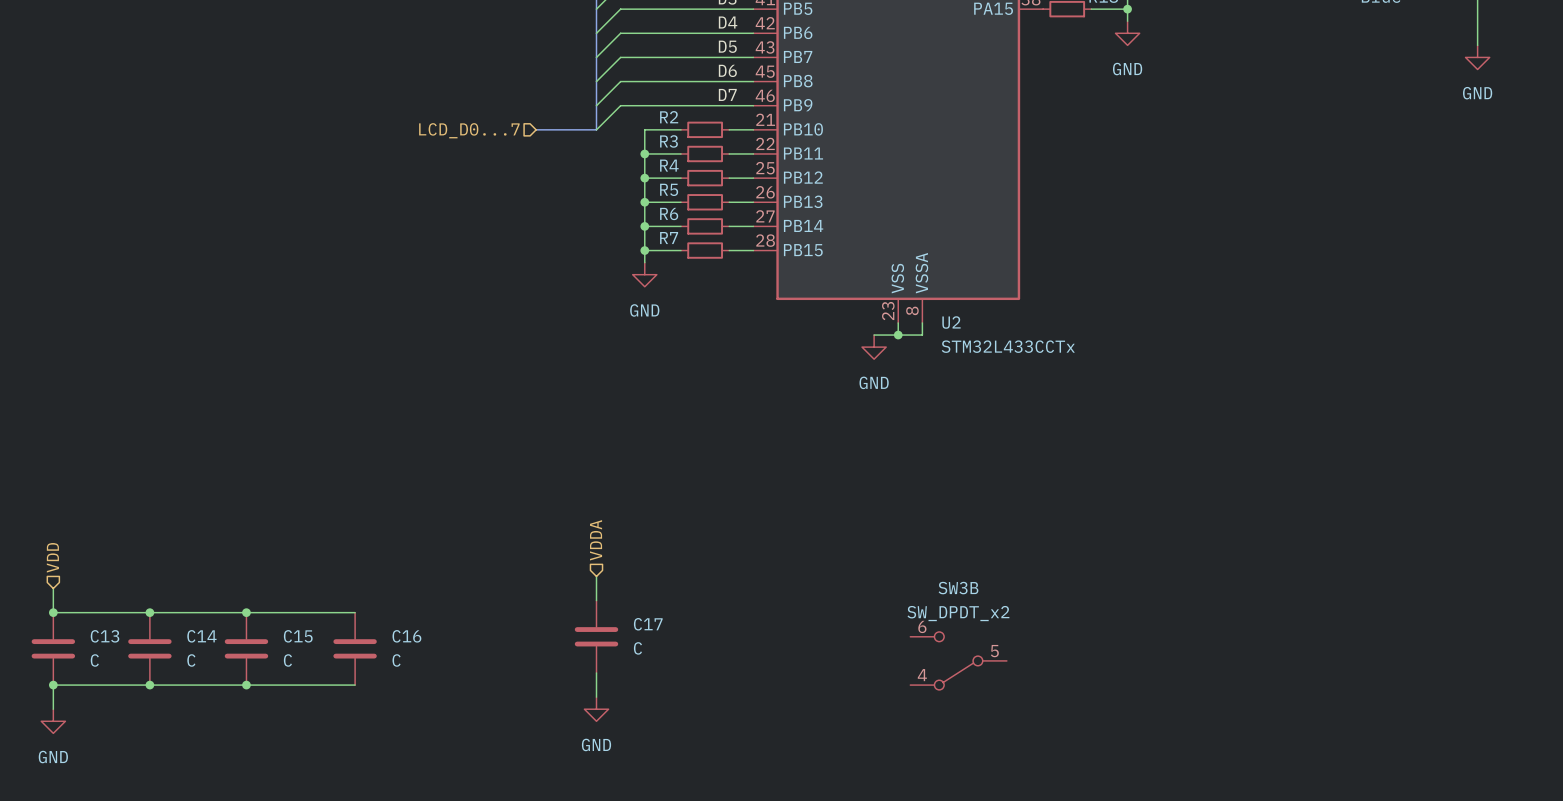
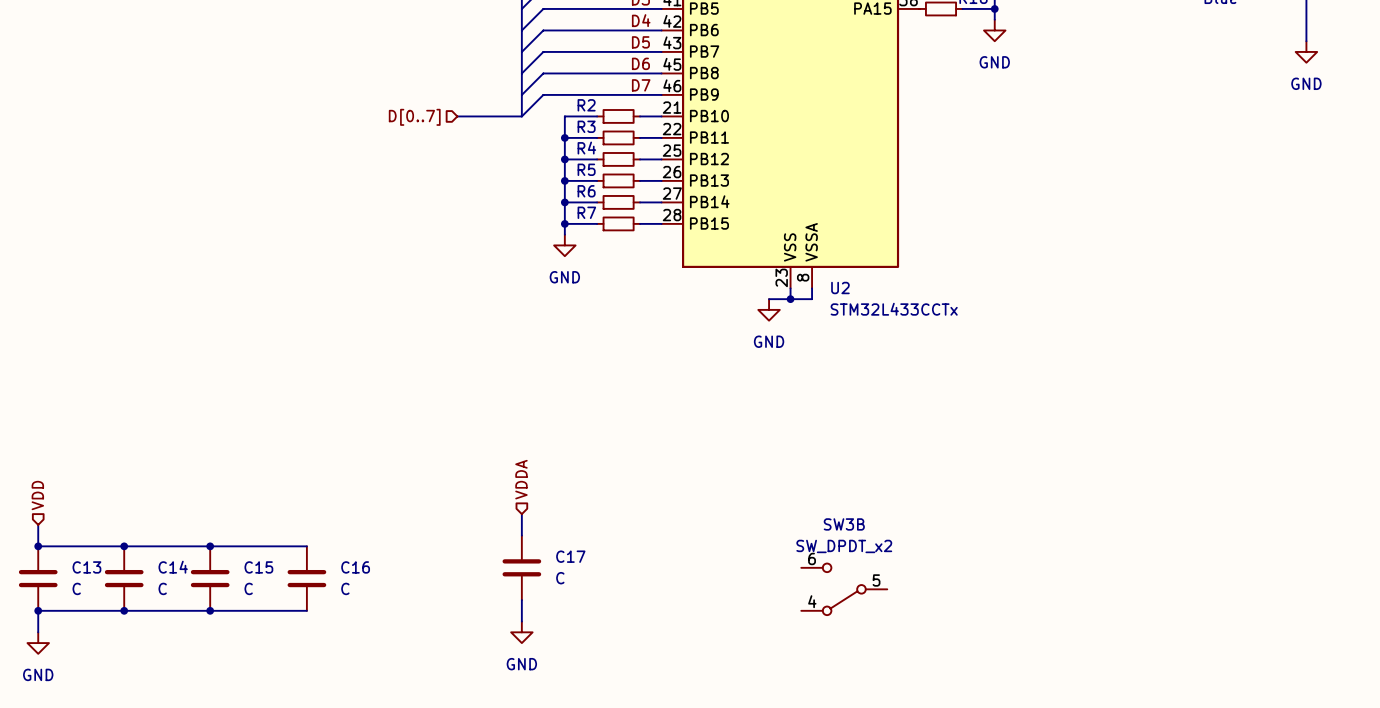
bus: none -> (457, 116) (468, 116)
hierarchical label: LCD_D0...7 (469, 130) -> none
hierarchical label: none -> D[0..7] (414, 117)

